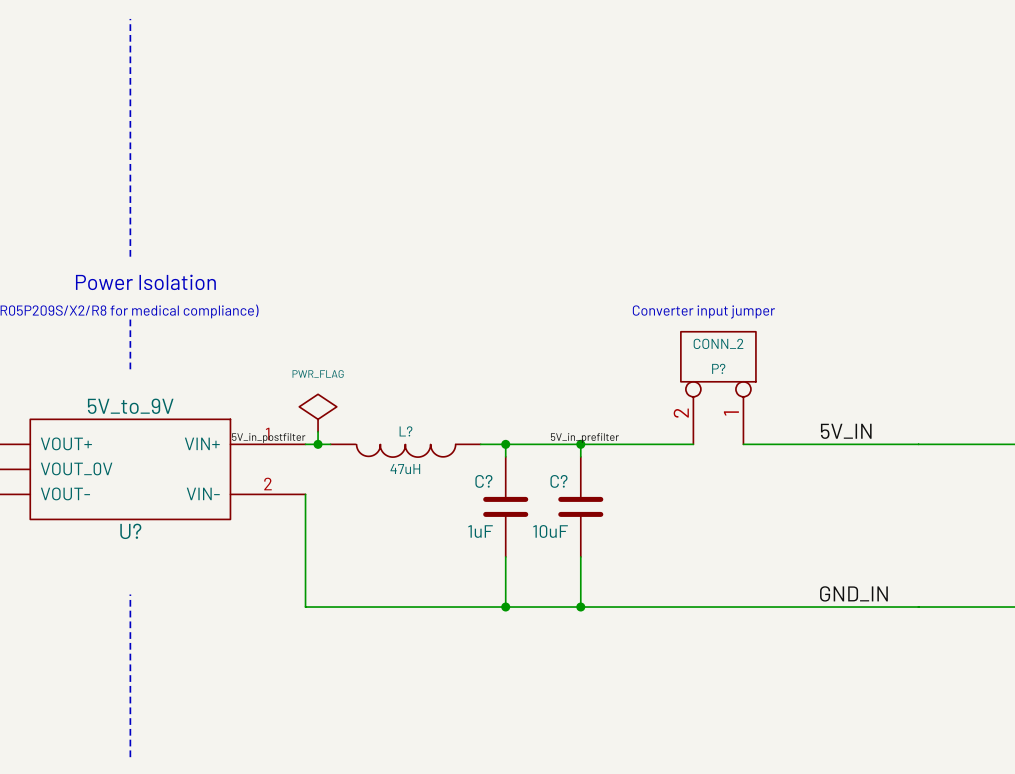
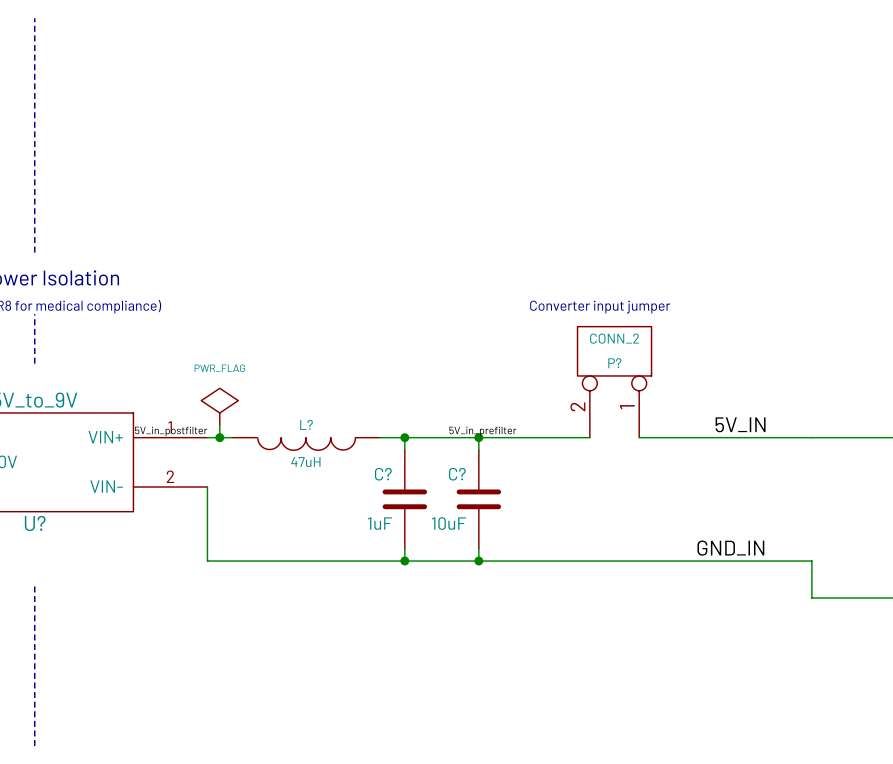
wire: (305, 569) (305, 607) (918, 607) -> (207, 561) (811, 561) (811, 598)
wire: (505, 569) (505, 607) -> none
wire: (580, 569) (580, 607) -> none
label position: GND_IN (853, 593) -> GND_IN (730, 548)
junction position: (505, 607) -> (404, 561)
junction position: (580, 607) -> (478, 561)

